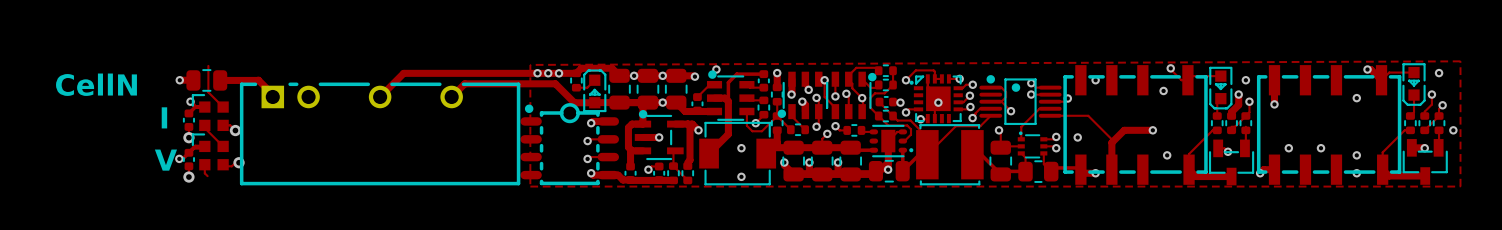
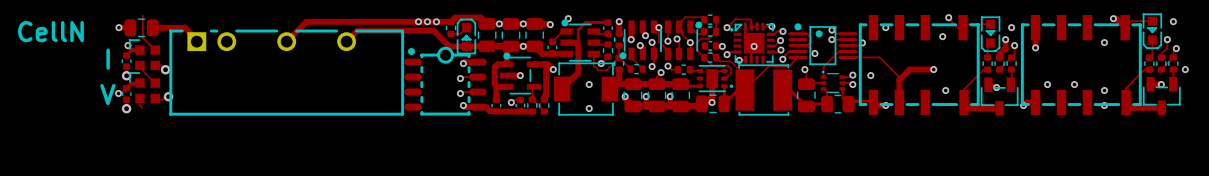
zone outline: (1460, 61) (1460, 186) (530, 186) (530, 64) (1460, 61) -> none

